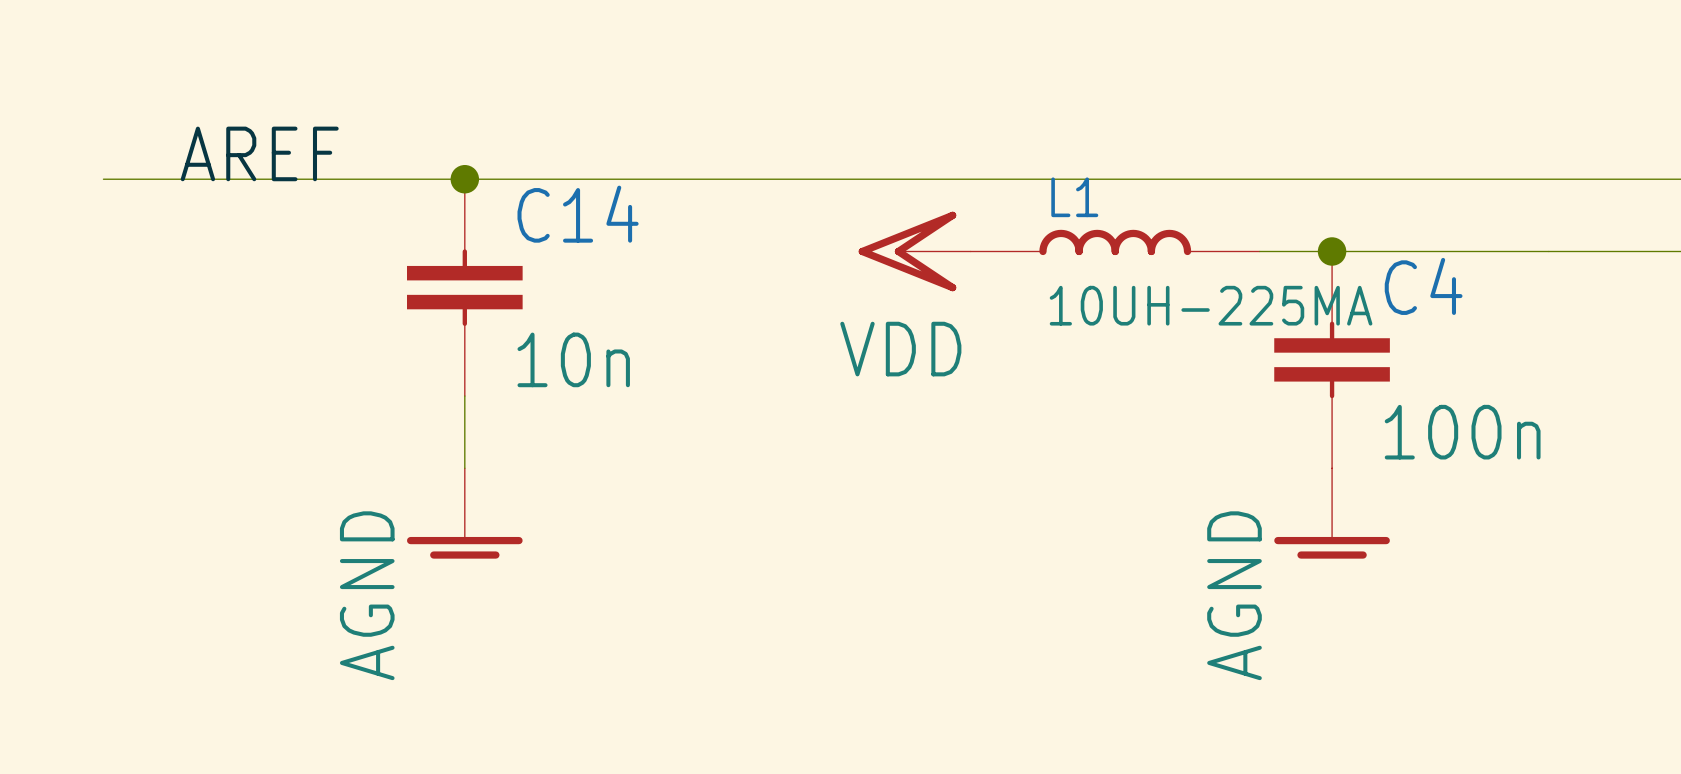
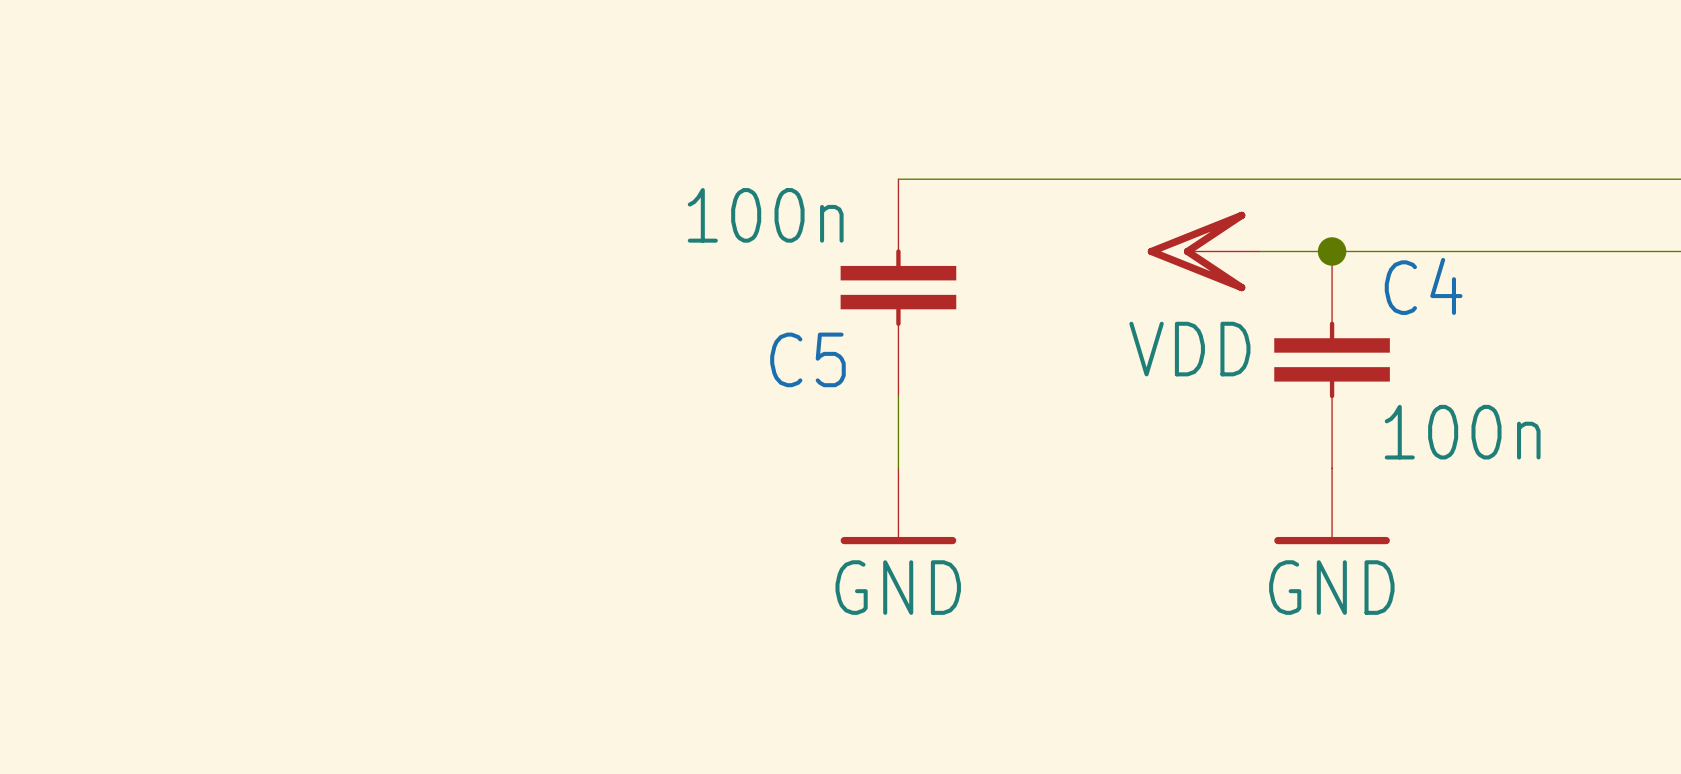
label: AREF (259, 153) -> none
wire: (103, 179) (898, 179) -> none
junction: (464, 179) -> none
L1: 10UH-225MA (1115, 242) -> none
power symbol position: VDD (914, 251) -> VDD (1203, 251)
C14: 10n (464, 287) -> none
C5: none -> 100n (898, 287)
wire: (464, 396) (464, 468) -> (898, 396) (898, 468)
power symbol: none -> GND (898, 506)
power symbol: AGND (464, 513) -> none
power symbol: AGND (1332, 513) -> GND (1332, 506)

